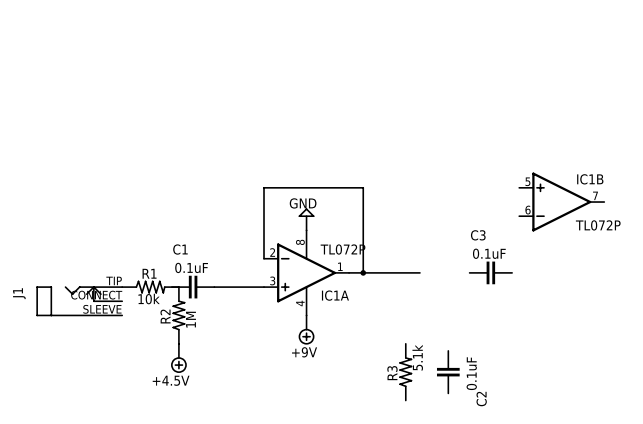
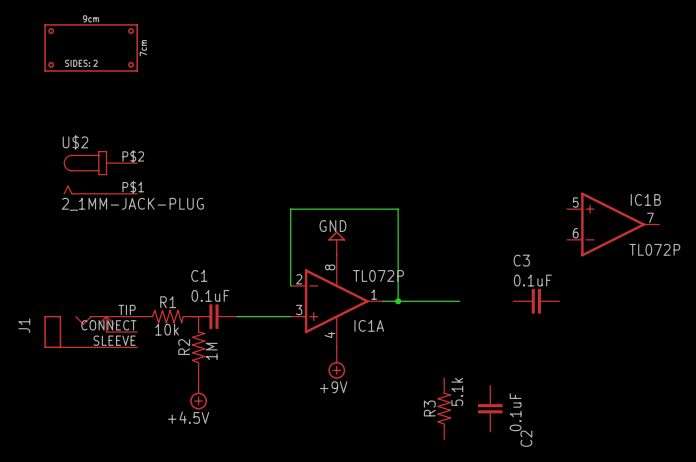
part: none -> (91, 47)
U$2: none -> 2_1MM-JACK-PLUG (100, 172)

